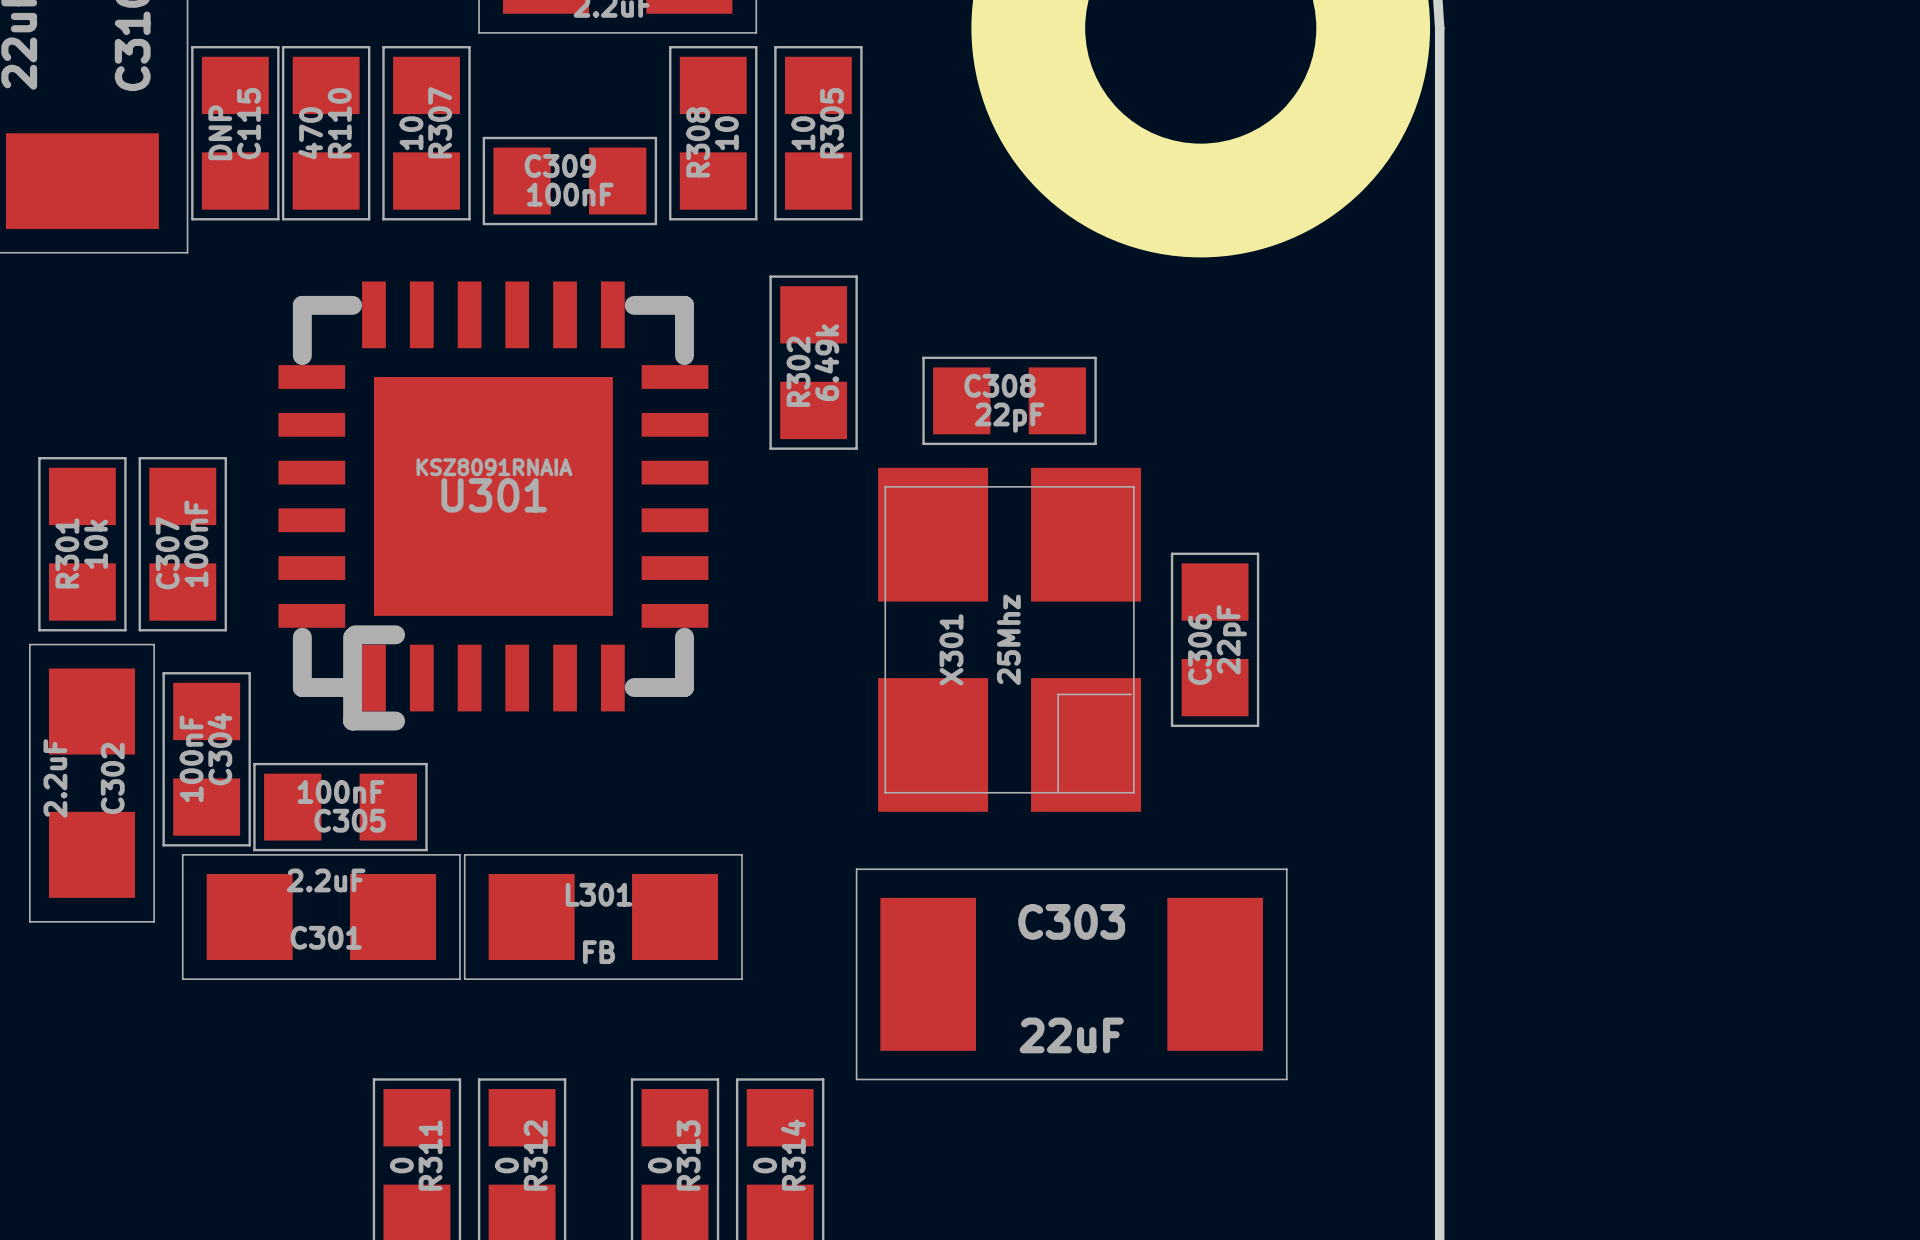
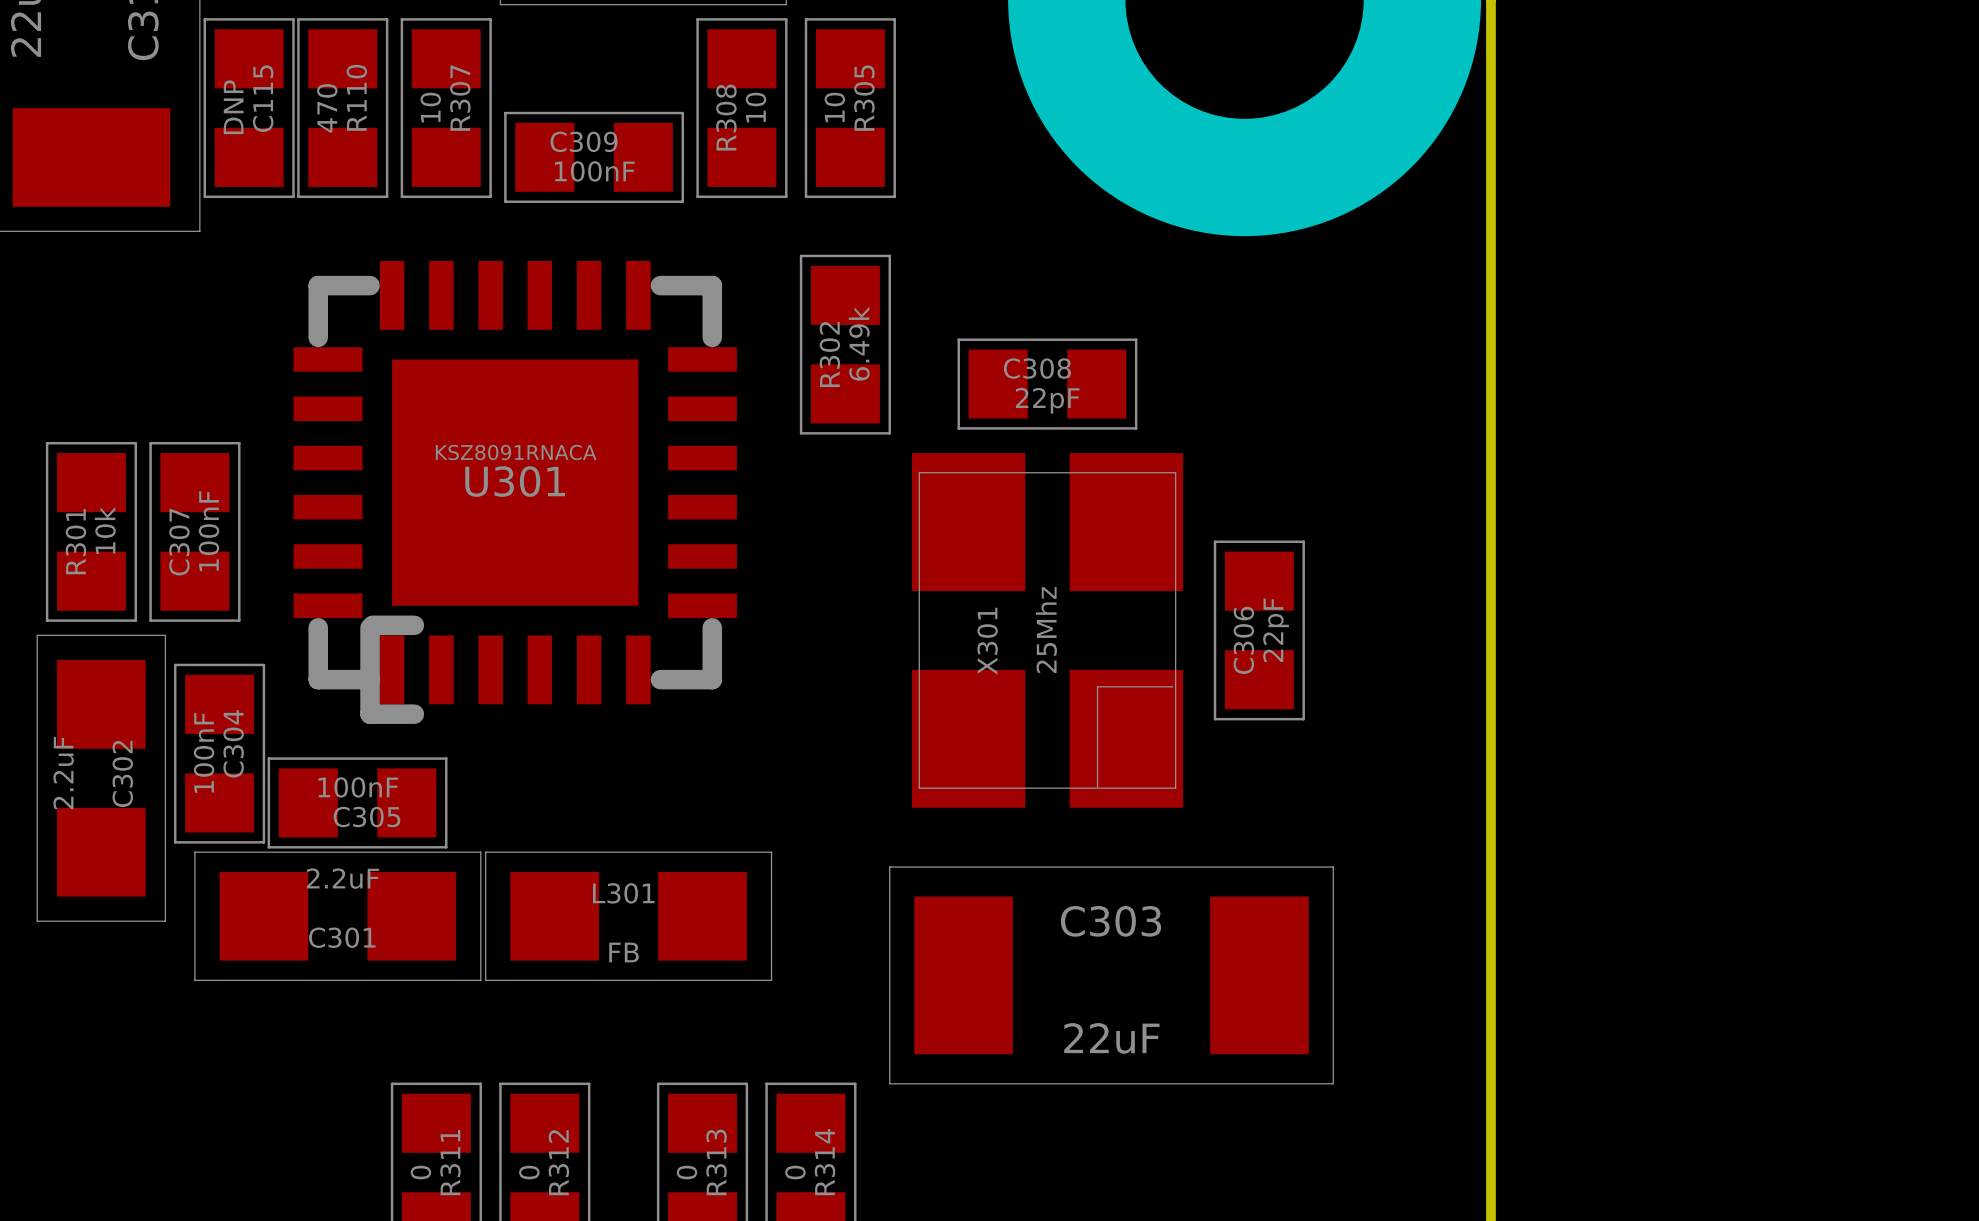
U301 value: KSZ8091RNAIA (494, 467) -> KSZ8091RNACA (516, 452)

